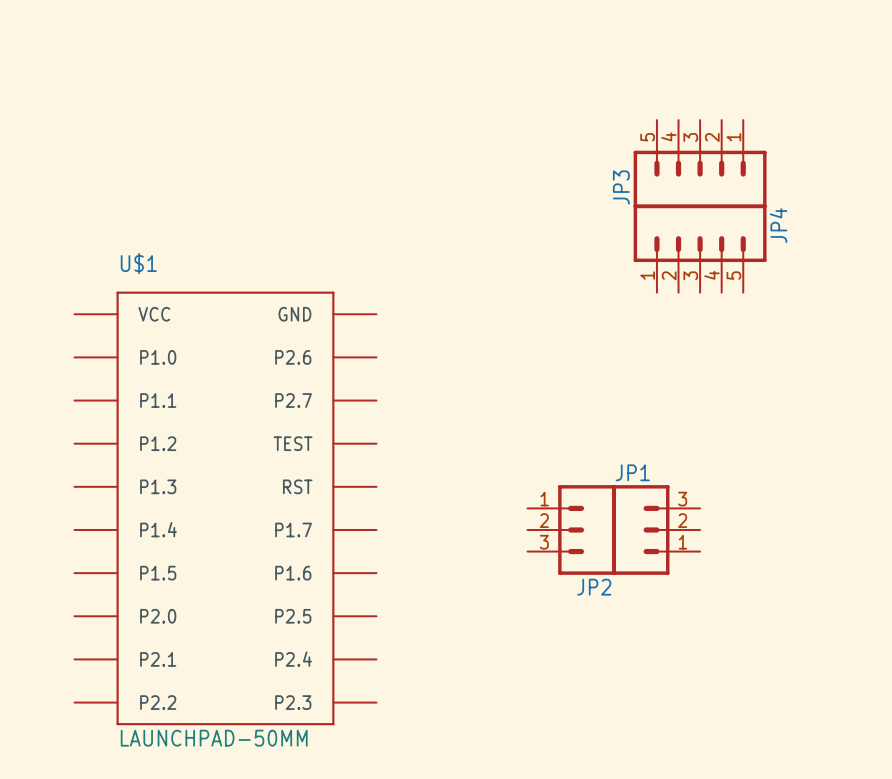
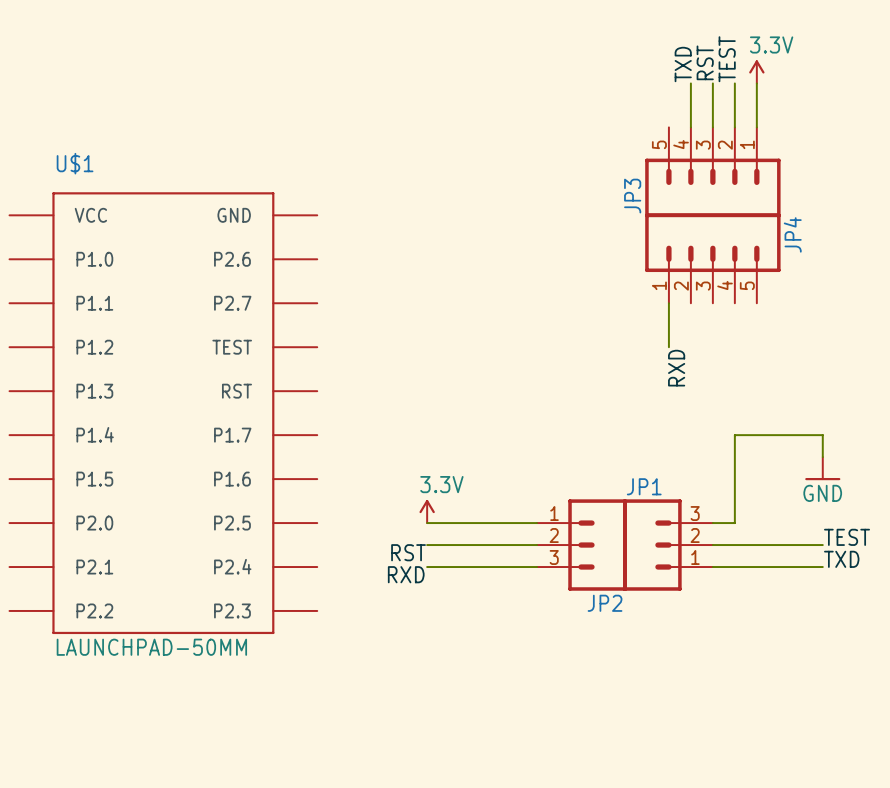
label: none -> TEST (727, 59)
label: none -> RST (705, 62)
label: none -> TXD (683, 64)
power symbol: none -> 3.3V (756, 71)
wire: none -> (690, 83) (690, 127)
wire: none -> (712, 83) (712, 127)
wire: none -> (734, 83) (734, 127)
wire: none -> (756, 83) (756, 127)
wire: none -> (668, 303) (668, 347)
label: none -> RXD (676, 368)
wire: none -> (822, 457) (822, 435) (734, 435) (734, 523) (712, 523)
power symbol: none -> GND (822, 468)
power symbol: none -> 3.3V (427, 511)
U$1 position: (225, 508) -> (163, 413)
wire: none -> (427, 523) (537, 523)
label: none -> TEST (847, 537)
wire: none -> (427, 545) (537, 545)
wire: none -> (712, 545) (822, 545)
label: none -> RST (408, 552)
label: none -> TXD (841, 559)
wire: none -> (427, 567) (537, 567)
wire: none -> (712, 567) (822, 567)
label: none -> RXD (406, 574)

